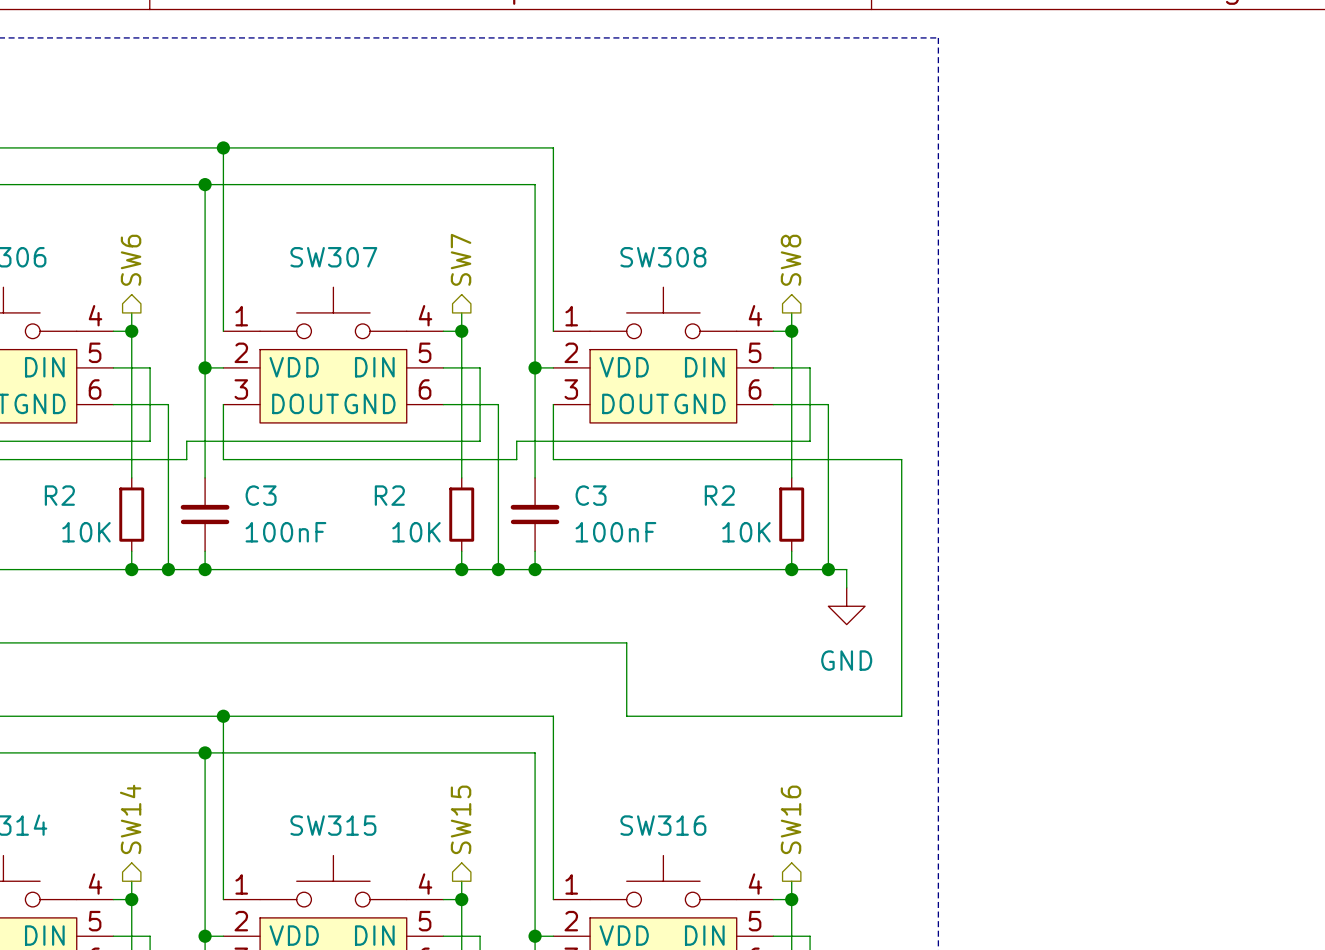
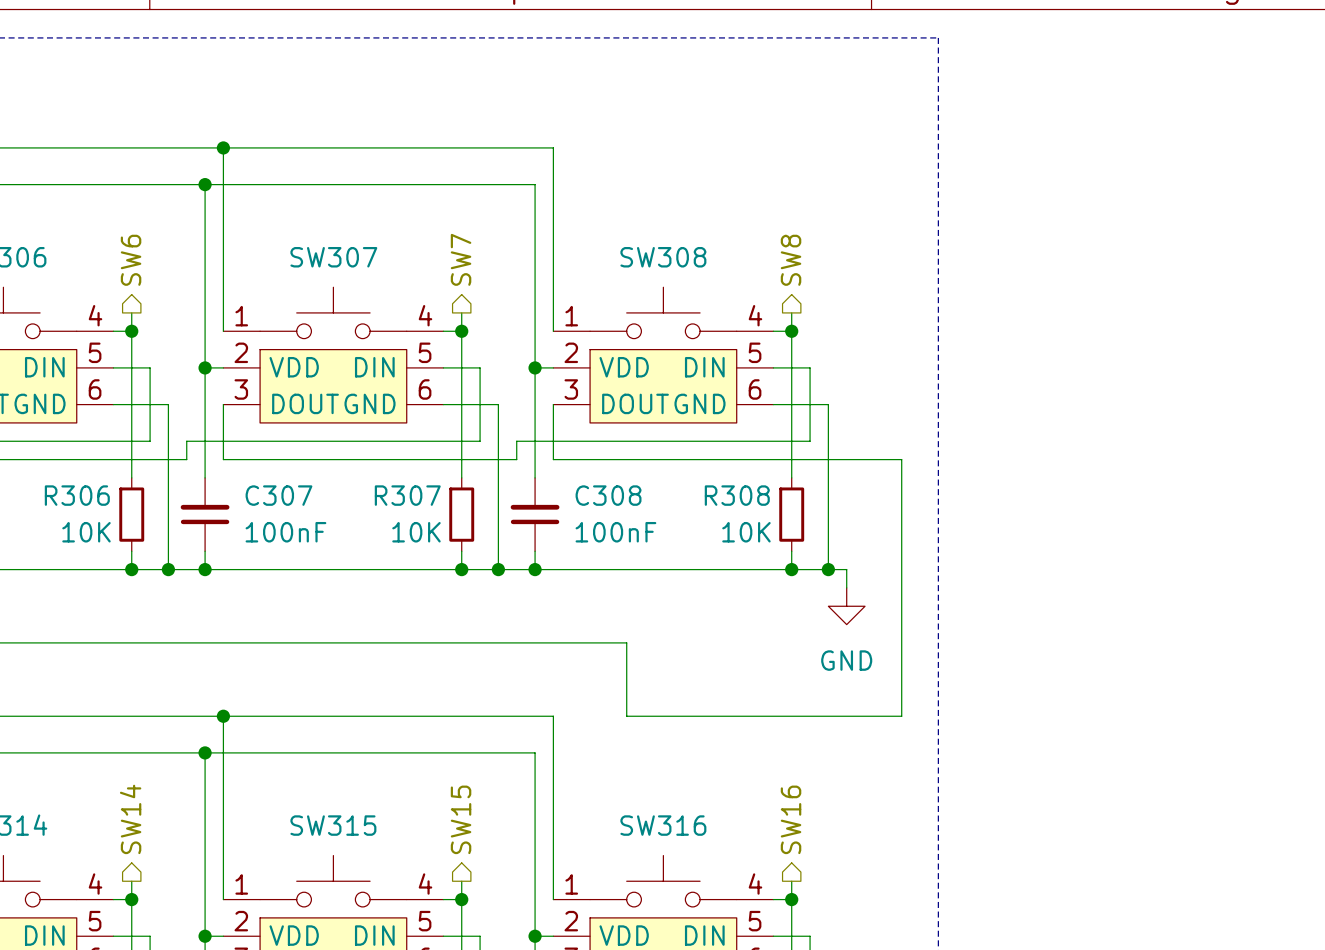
R2 name: R2 (59, 495) -> R306 (77, 495)
C3 name: C3 (261, 495) -> C307 (278, 495)
R2 name: R2 (389, 495) -> R307 (407, 495)
C3 name: C3 (591, 495) -> C308 (608, 495)
R2 name: R2 (719, 495) -> R308 (737, 495)

